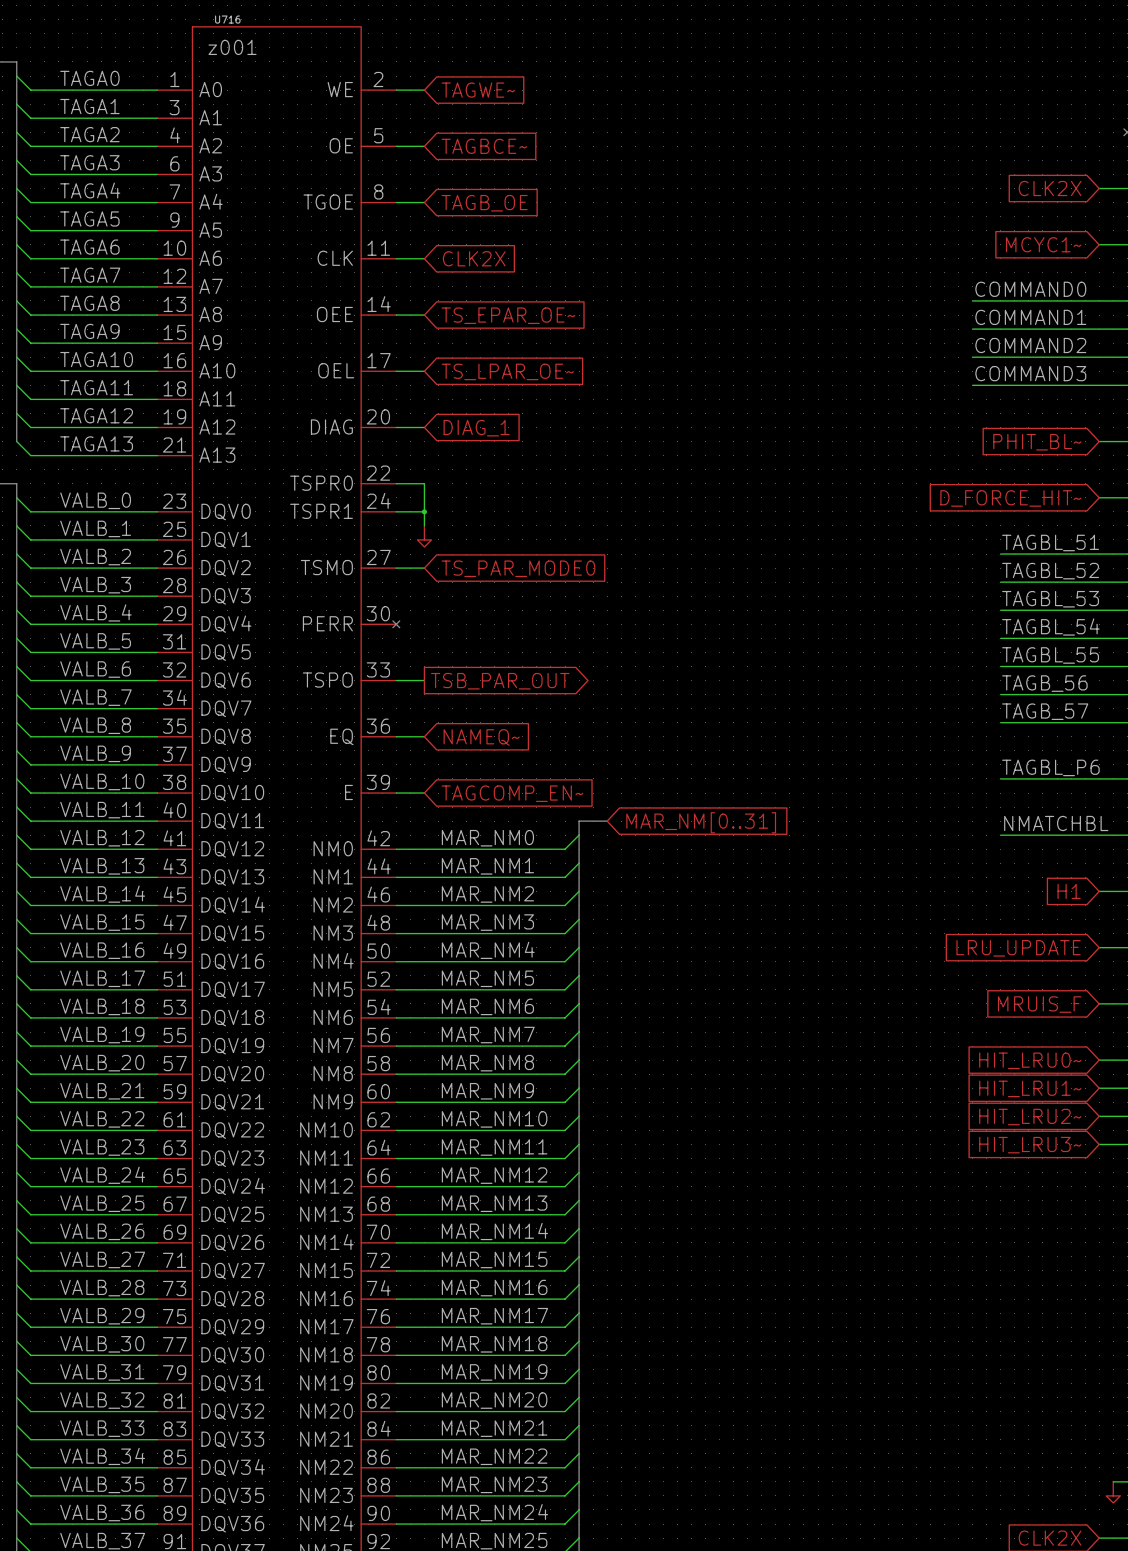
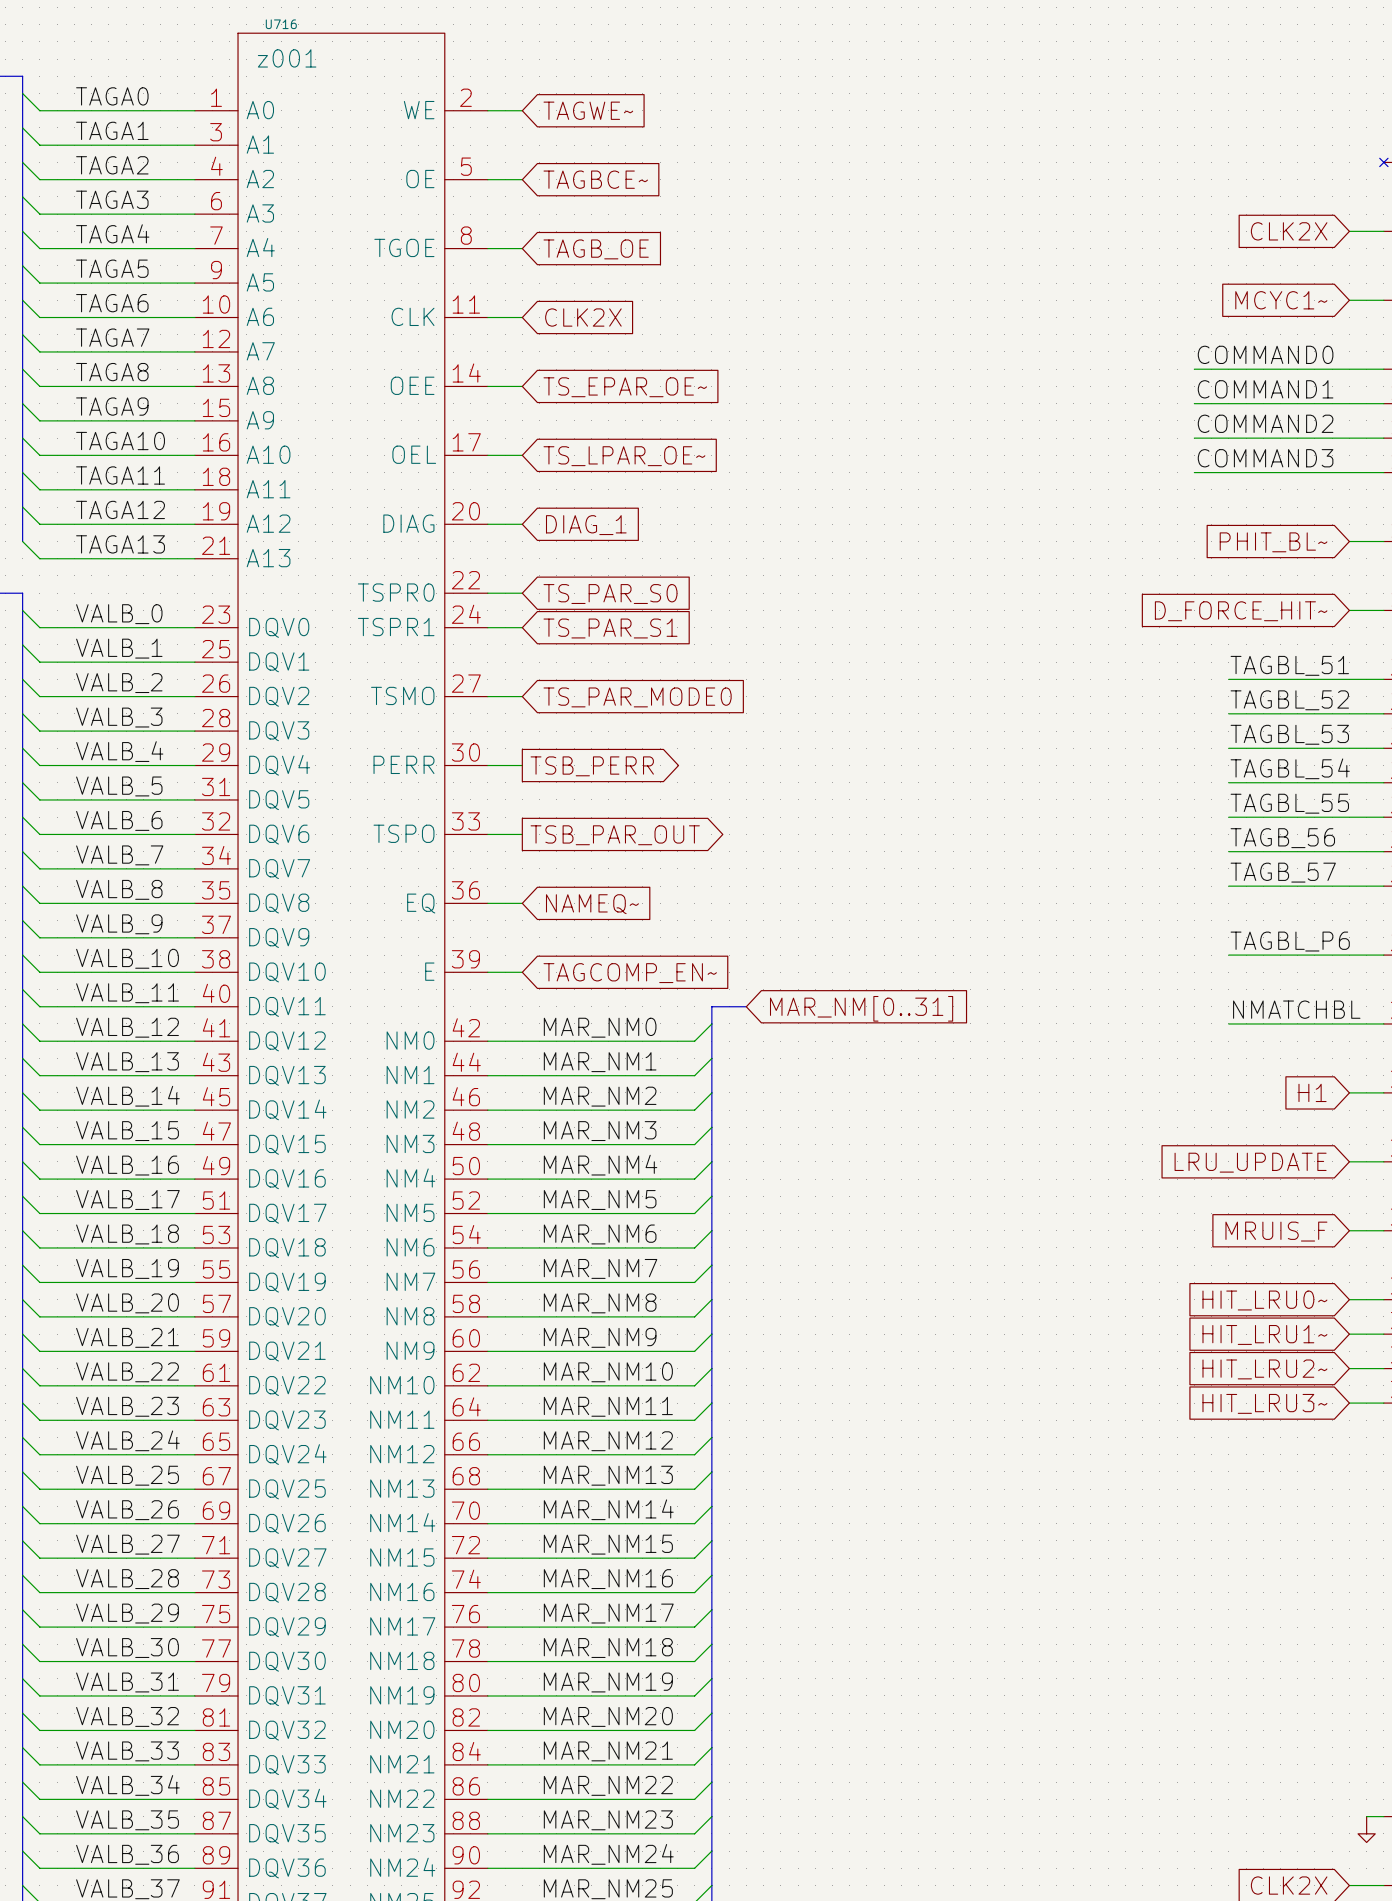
wire: (424, 483) (424, 525) -> none
global label: none -> TS_PAR_S0 (610, 594)
junction: (424, 511) -> none
global label: none -> TS_PAR_S1 (610, 628)
power symbol: (424, 536) -> none
wire: none -> (487, 765) (522, 765)
no-connect mark: (396, 624) -> none
global label: none -> TSB_PERR (592, 766)

